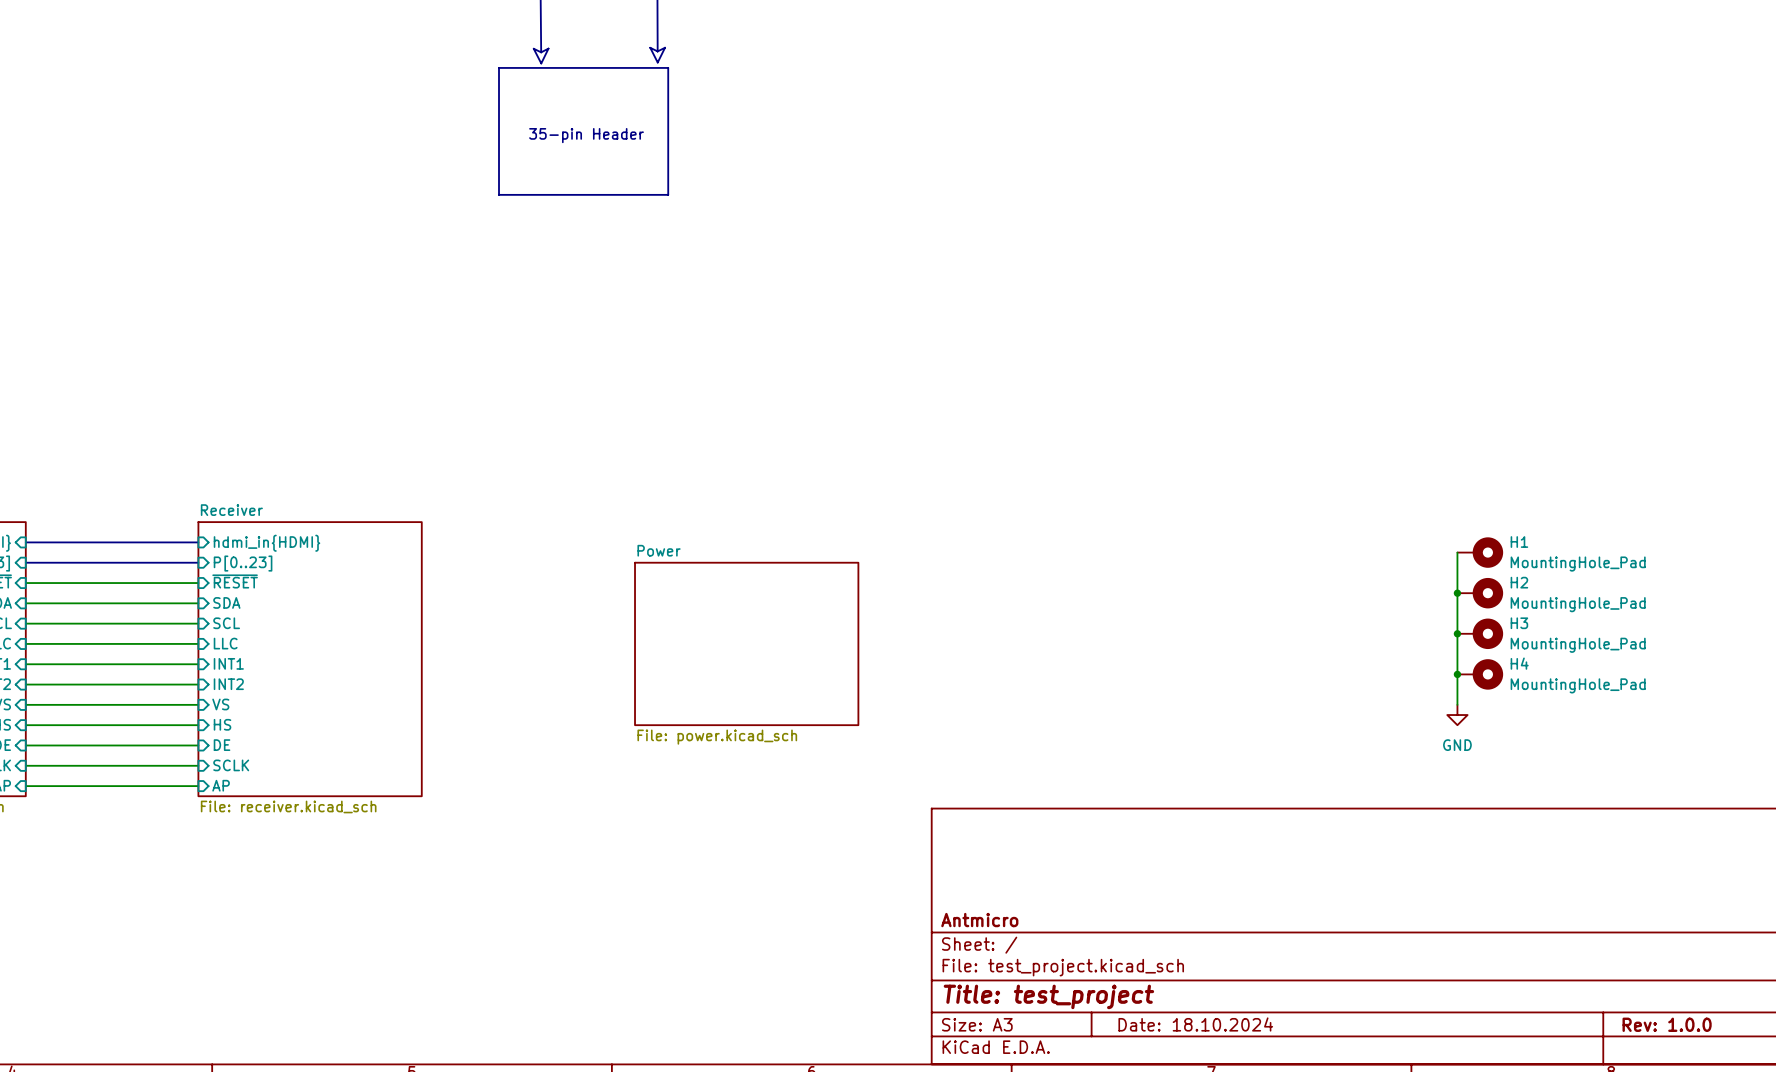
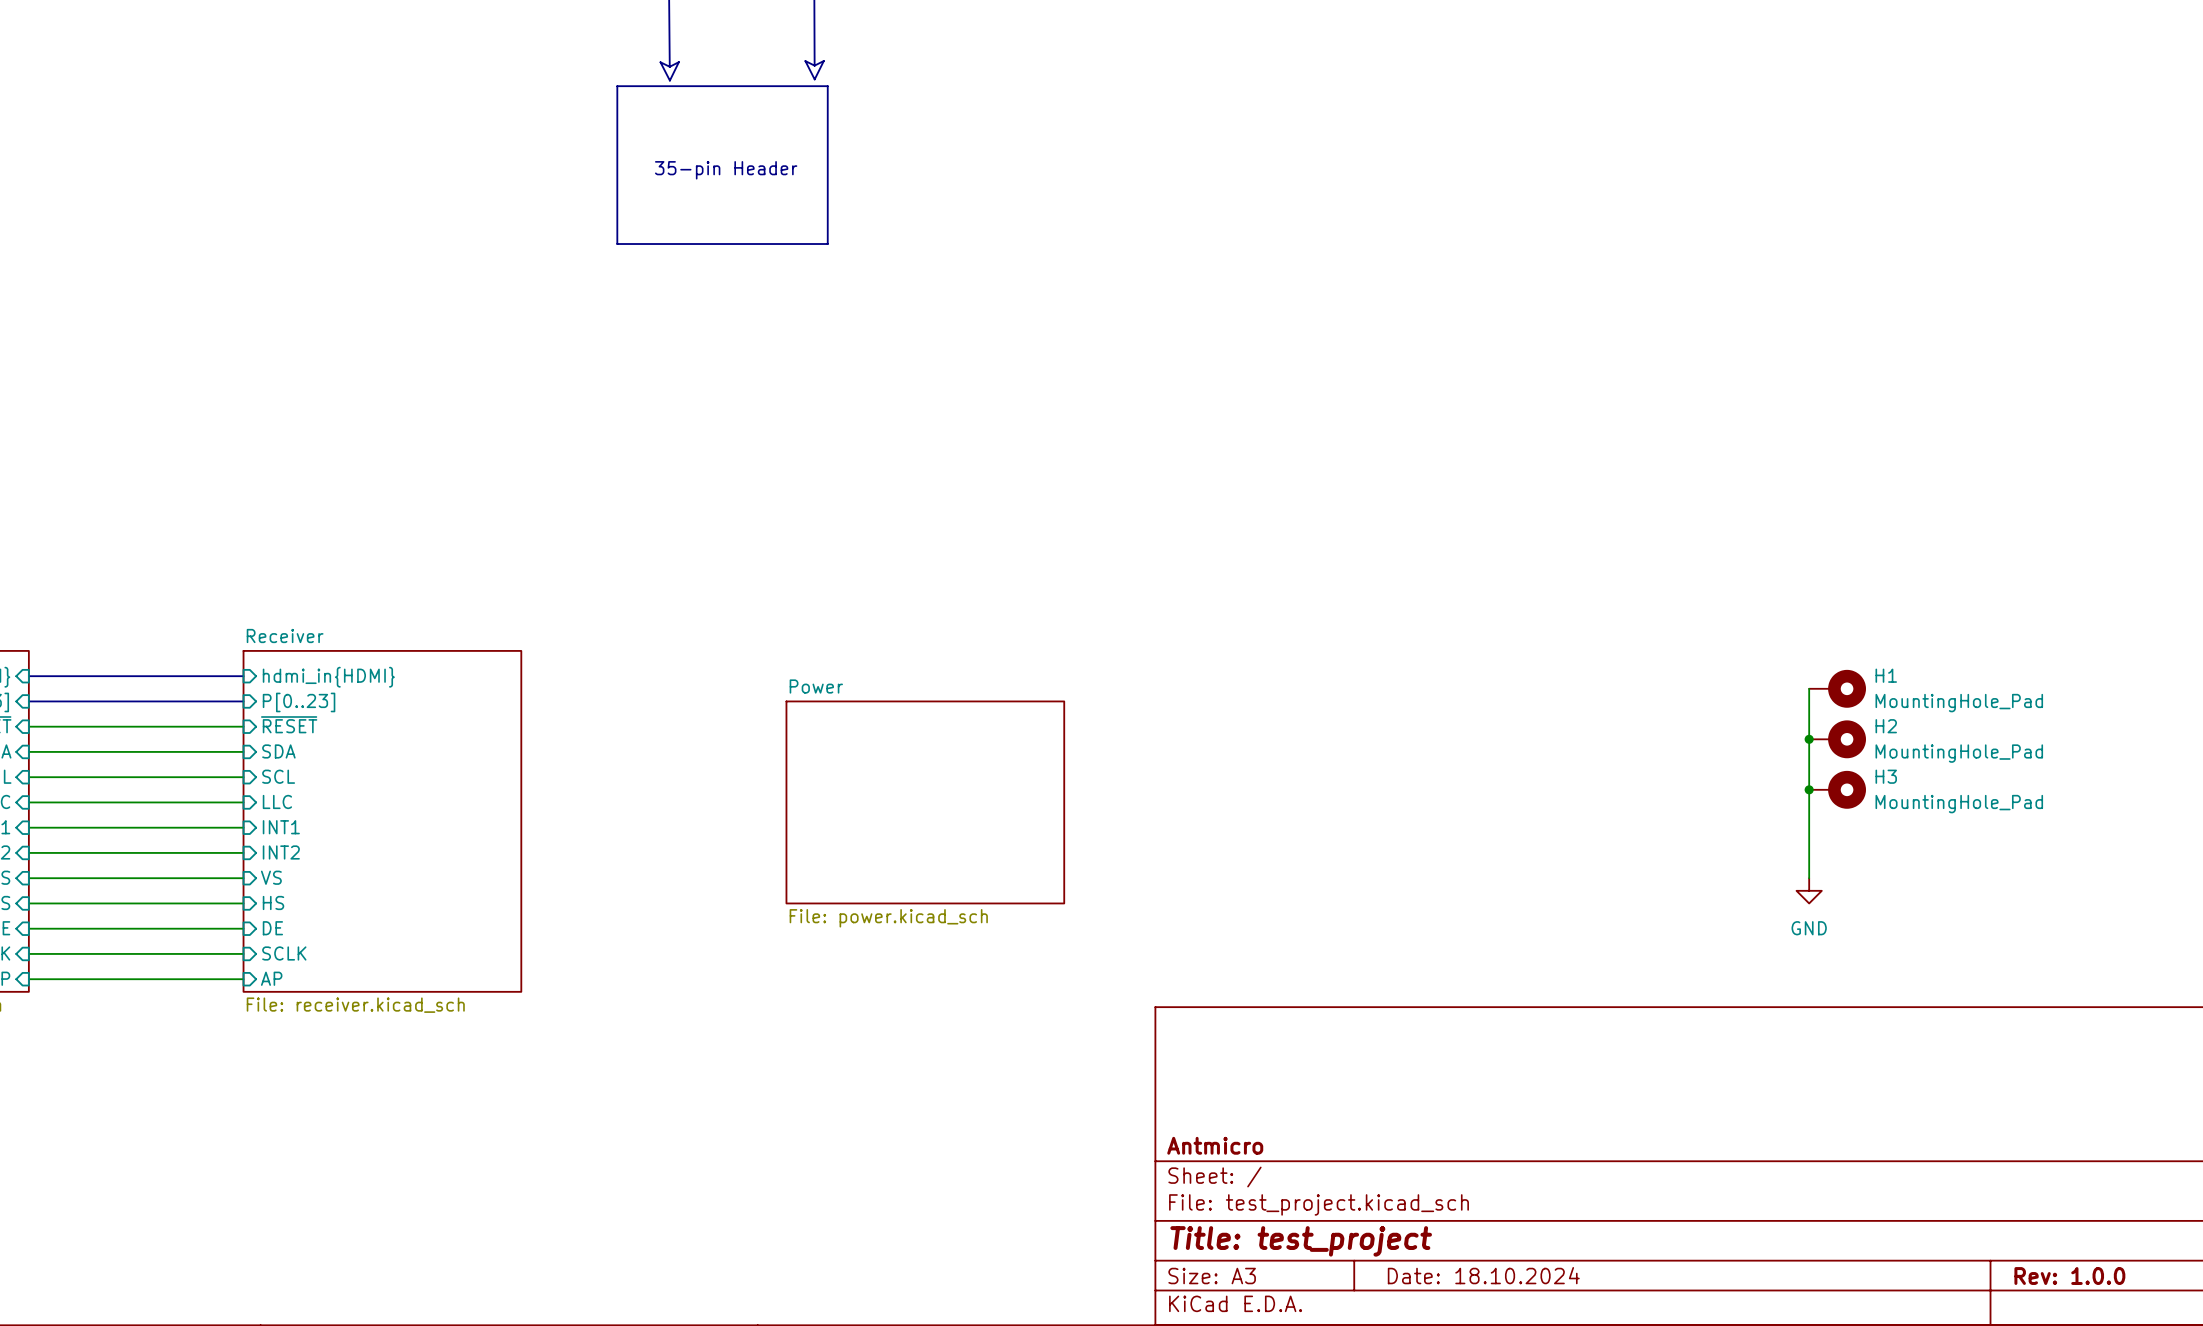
junction: (1457, 674) -> none
H4: MountingHole_Pad (1480, 674) -> none

